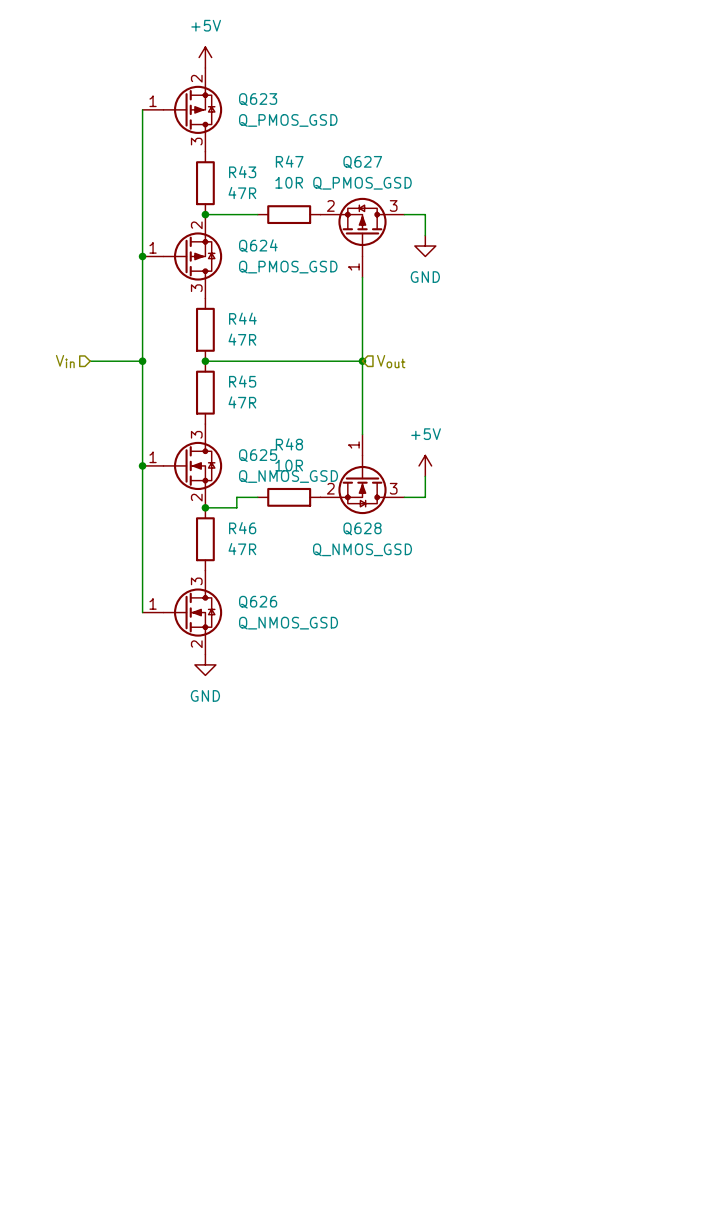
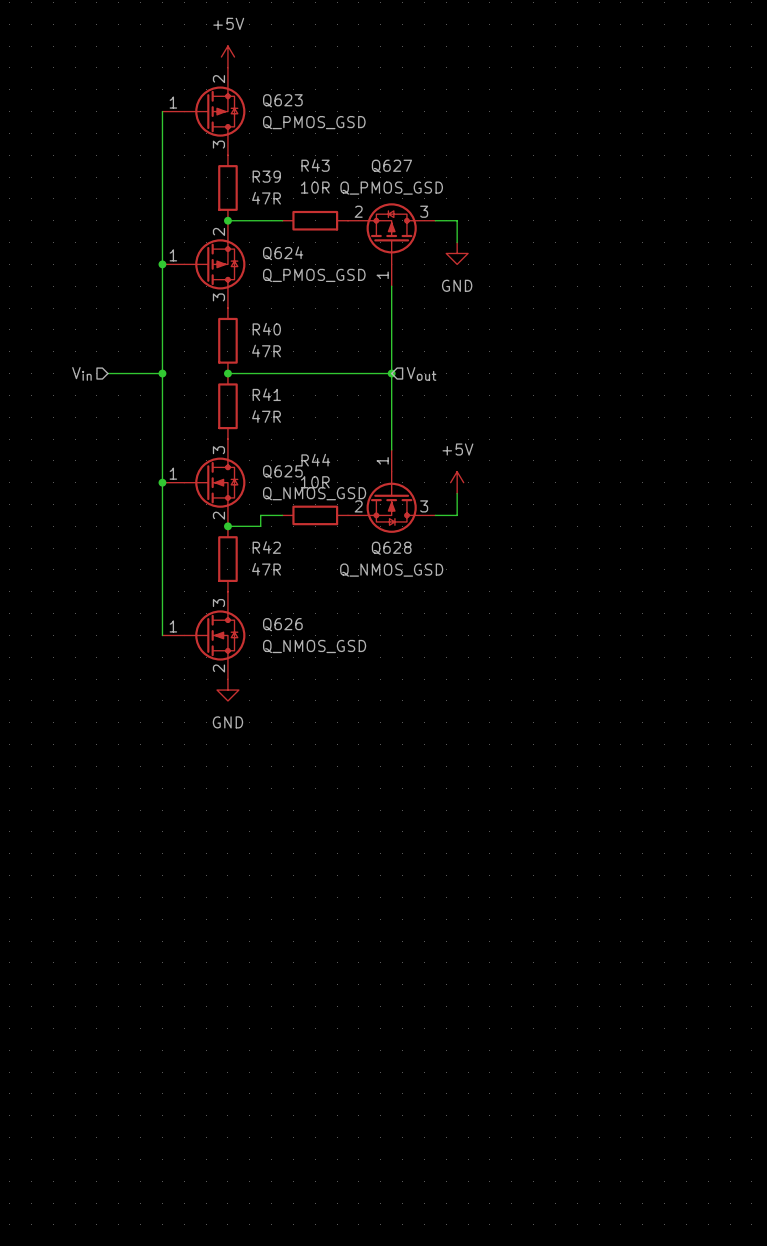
R47 name: R47 (289, 161) -> R43 (315, 165)
R43 name: R43 (242, 172) -> R39 (266, 176)
R44 name: R44 (242, 318) -> R40 (266, 329)
R45 name: R45 (242, 381) -> R41 (266, 394)
R48 name: R48 (289, 444) -> R44 (315, 460)
R46 name: R46 (242, 528) -> R42 (266, 547)

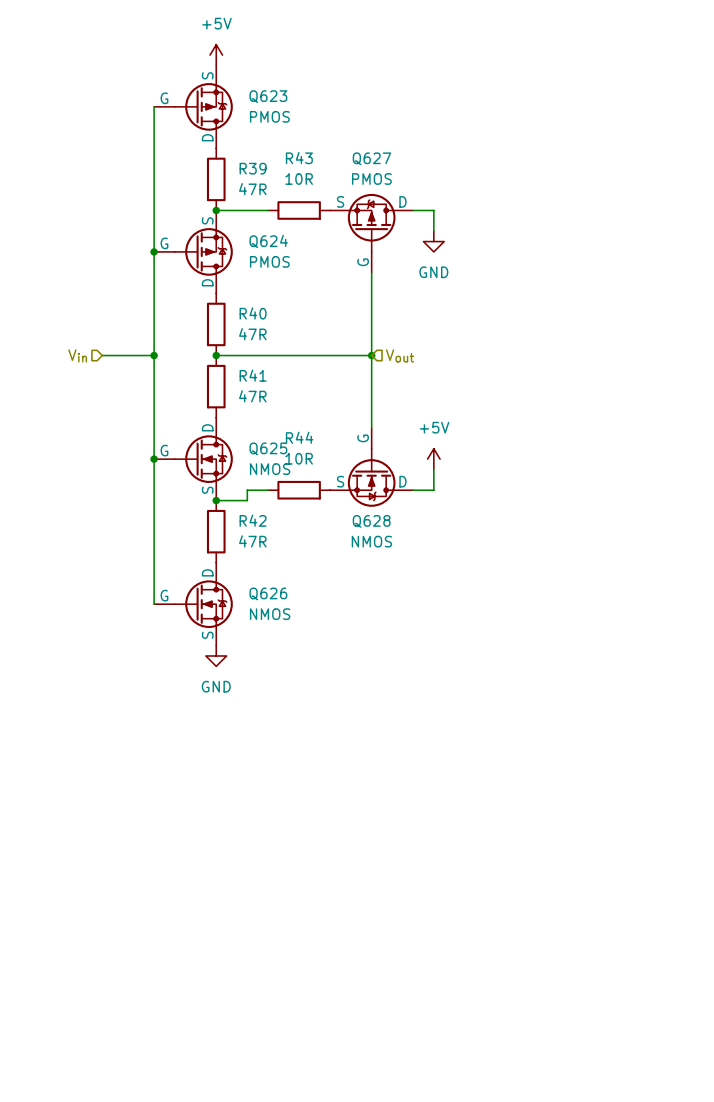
Q623 symbol: [162, 67, 246, 156] -> [154, 65, 233, 149]
Q623 value: Q_PMOS_GSD (314, 122) -> PMOS (269, 116)
Q627 value: Q_PMOS_GSD (391, 188) -> PMOS (371, 179)
Q627 symbol: [348, 203, 436, 287] -> [330, 193, 414, 273]
Q624 symbol: [162, 220, 246, 309] -> [154, 210, 233, 294]
Q624 value: Q_PMOS_GSD (314, 275) -> PMOS (269, 261)
Q625 symbol: [162, 439, 246, 527] -> [154, 417, 233, 501]
Q628 symbol: [348, 449, 436, 533] -> [330, 428, 414, 507]
Q625 value: Q_NMOS_GSD (314, 493) -> NMOS (270, 469)
Q628 value: Q_NMOS_GSD (391, 570) -> NMOS (371, 541)
Q626 symbol: [162, 591, 246, 680] -> [154, 562, 233, 646]
Q626 value: Q_NMOS_GSD (314, 646) -> NMOS (270, 614)

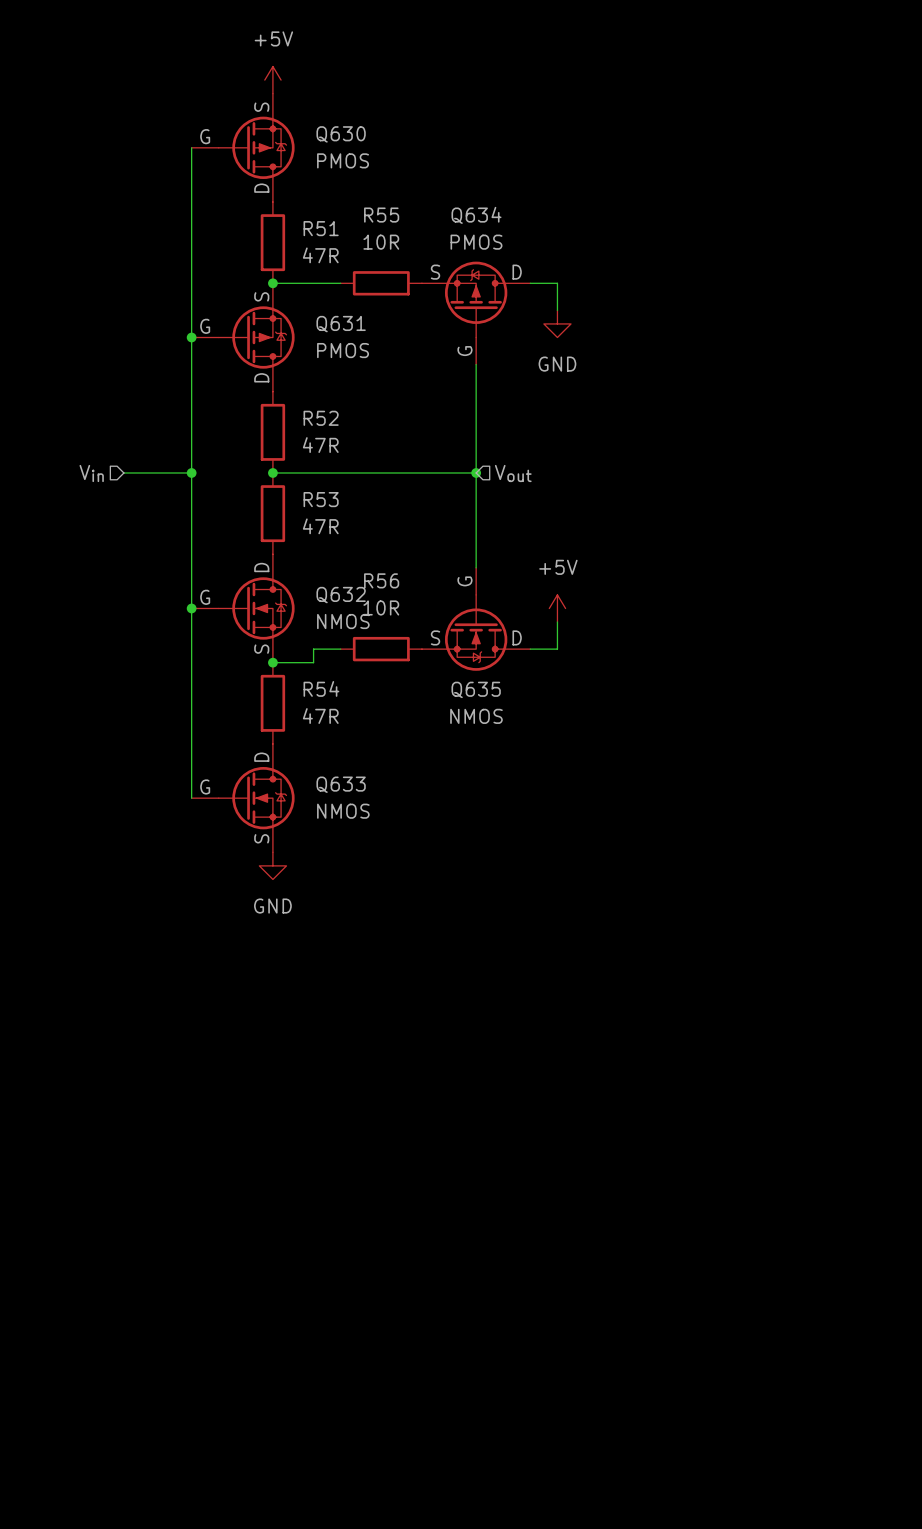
Q623 name: Q623 (268, 96) -> Q630 (341, 134)
R43 name: R43 (299, 158) -> R55 (381, 215)
Q627 name: Q627 (371, 158) -> Q634 (476, 215)
R39 name: R39 (253, 168) -> R51 (321, 228)
Q624 name: Q624 (268, 241) -> Q631 (341, 324)
R40 name: R40 (253, 313) -> R52 (321, 418)
R41 name: R41 (253, 375) -> R53 (321, 499)
R44 name: R44 (299, 437) -> R56 (381, 580)
Q625 name: Q625 (268, 448) -> Q632 (341, 595)
R42 name: R42 (253, 520) -> R54 (321, 688)
Q628 name: Q628 (371, 521) -> Q635 (476, 689)
Q626 name: Q626 (268, 593) -> Q633 (341, 784)

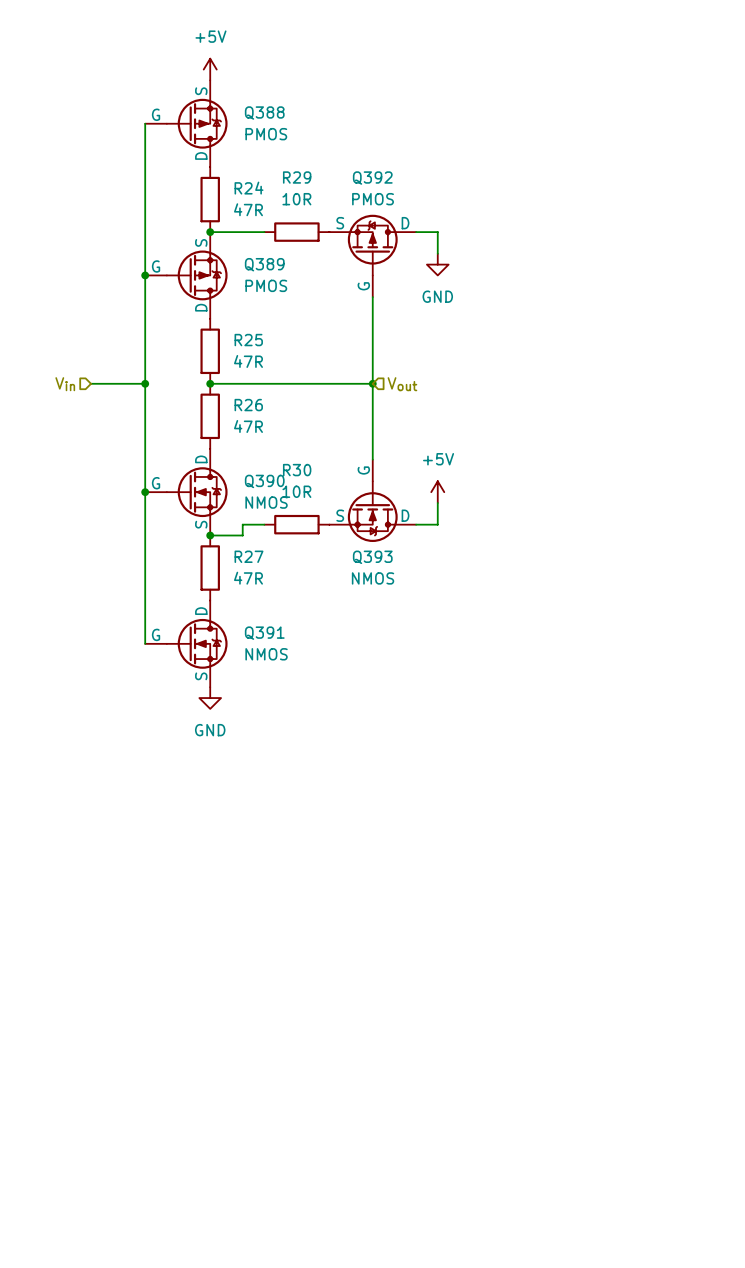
Q630 name: Q630 (341, 134) -> Q388 (264, 113)
R55 name: R55 (381, 215) -> R29 (297, 177)
Q634 name: Q634 (476, 215) -> Q392 (372, 178)
R51 name: R51 (321, 228) -> R24 (249, 188)
Q631 name: Q631 (341, 324) -> Q389 (264, 264)
R52 name: R52 (321, 418) -> R25 (248, 340)
R53 name: R53 (321, 499) -> R26 (248, 405)
R56 name: R56 (381, 580) -> R30 (297, 470)
Q632 name: Q632 (341, 595) -> Q390 (264, 481)
R54 name: R54 (321, 688) -> R27 (249, 556)
Q635 name: Q635 (476, 689) -> Q393 (372, 557)
Q633 name: Q633 (341, 784) -> Q391 (264, 633)

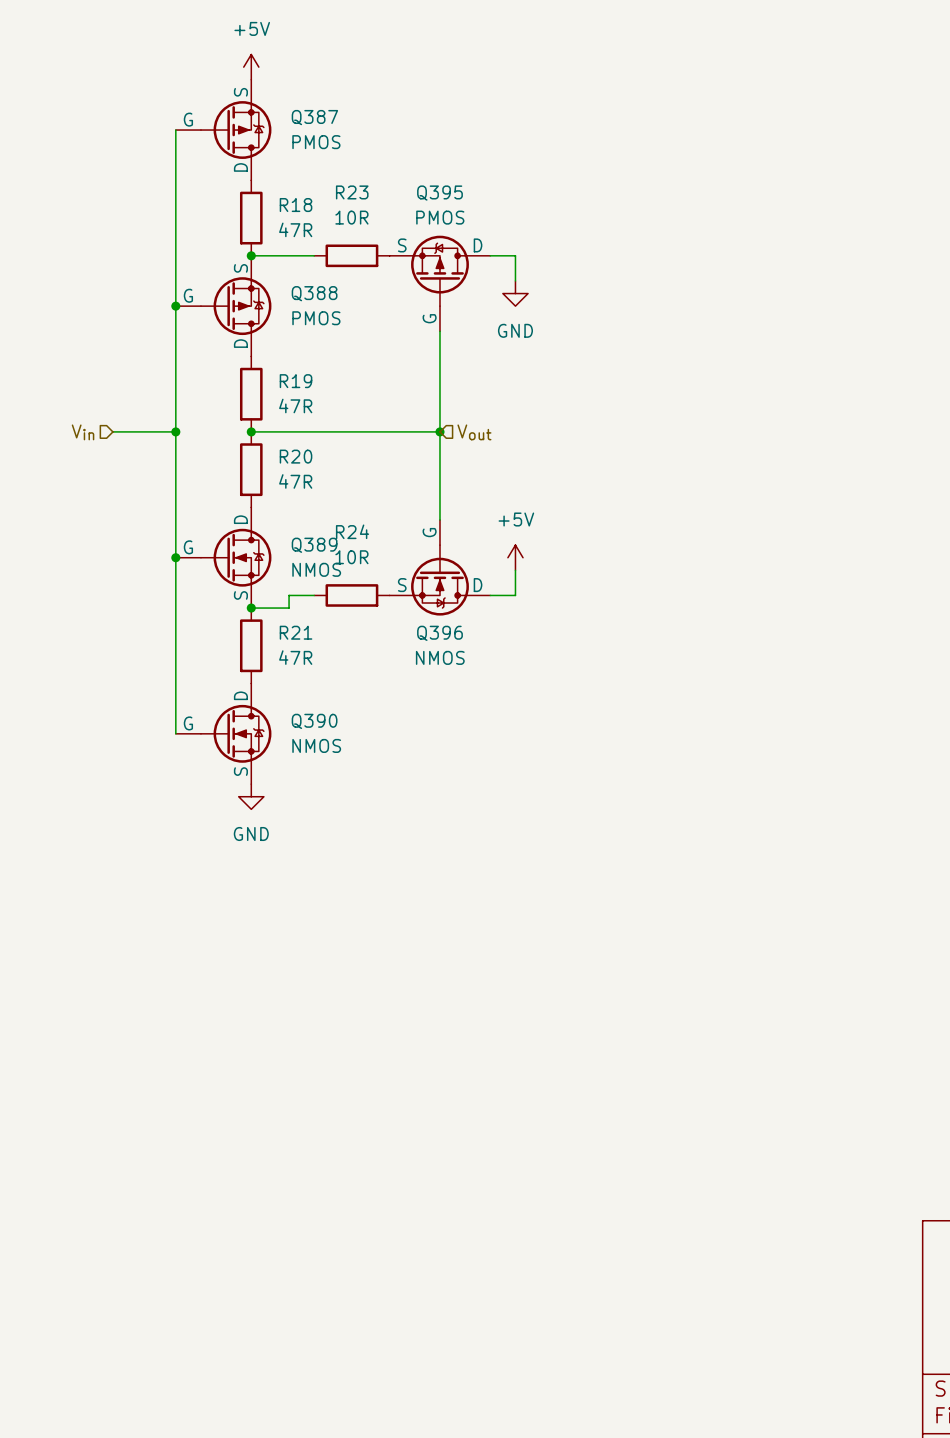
Q388 name: Q388 (264, 113) -> Q387 (314, 117)
R29 name: R29 (297, 177) -> R23 (352, 192)
Q392 name: Q392 (372, 178) -> Q395 (439, 193)
R24 name: R24 (249, 188) -> R18 (296, 205)
Q389 name: Q389 (264, 264) -> Q388 (314, 293)
R25 name: R25 (248, 340) -> R19 (296, 381)
R26 name: R26 (248, 405) -> R20 (296, 456)
R30 name: R30 (297, 470) -> R24 (352, 531)
Q390 name: Q390 (264, 481) -> Q389 (314, 545)
R27 name: R27 (249, 556) -> R21 (296, 632)
Q393 name: Q393 (372, 557) -> Q396 (439, 633)
Q391 name: Q391 (264, 633) -> Q390 (314, 721)

